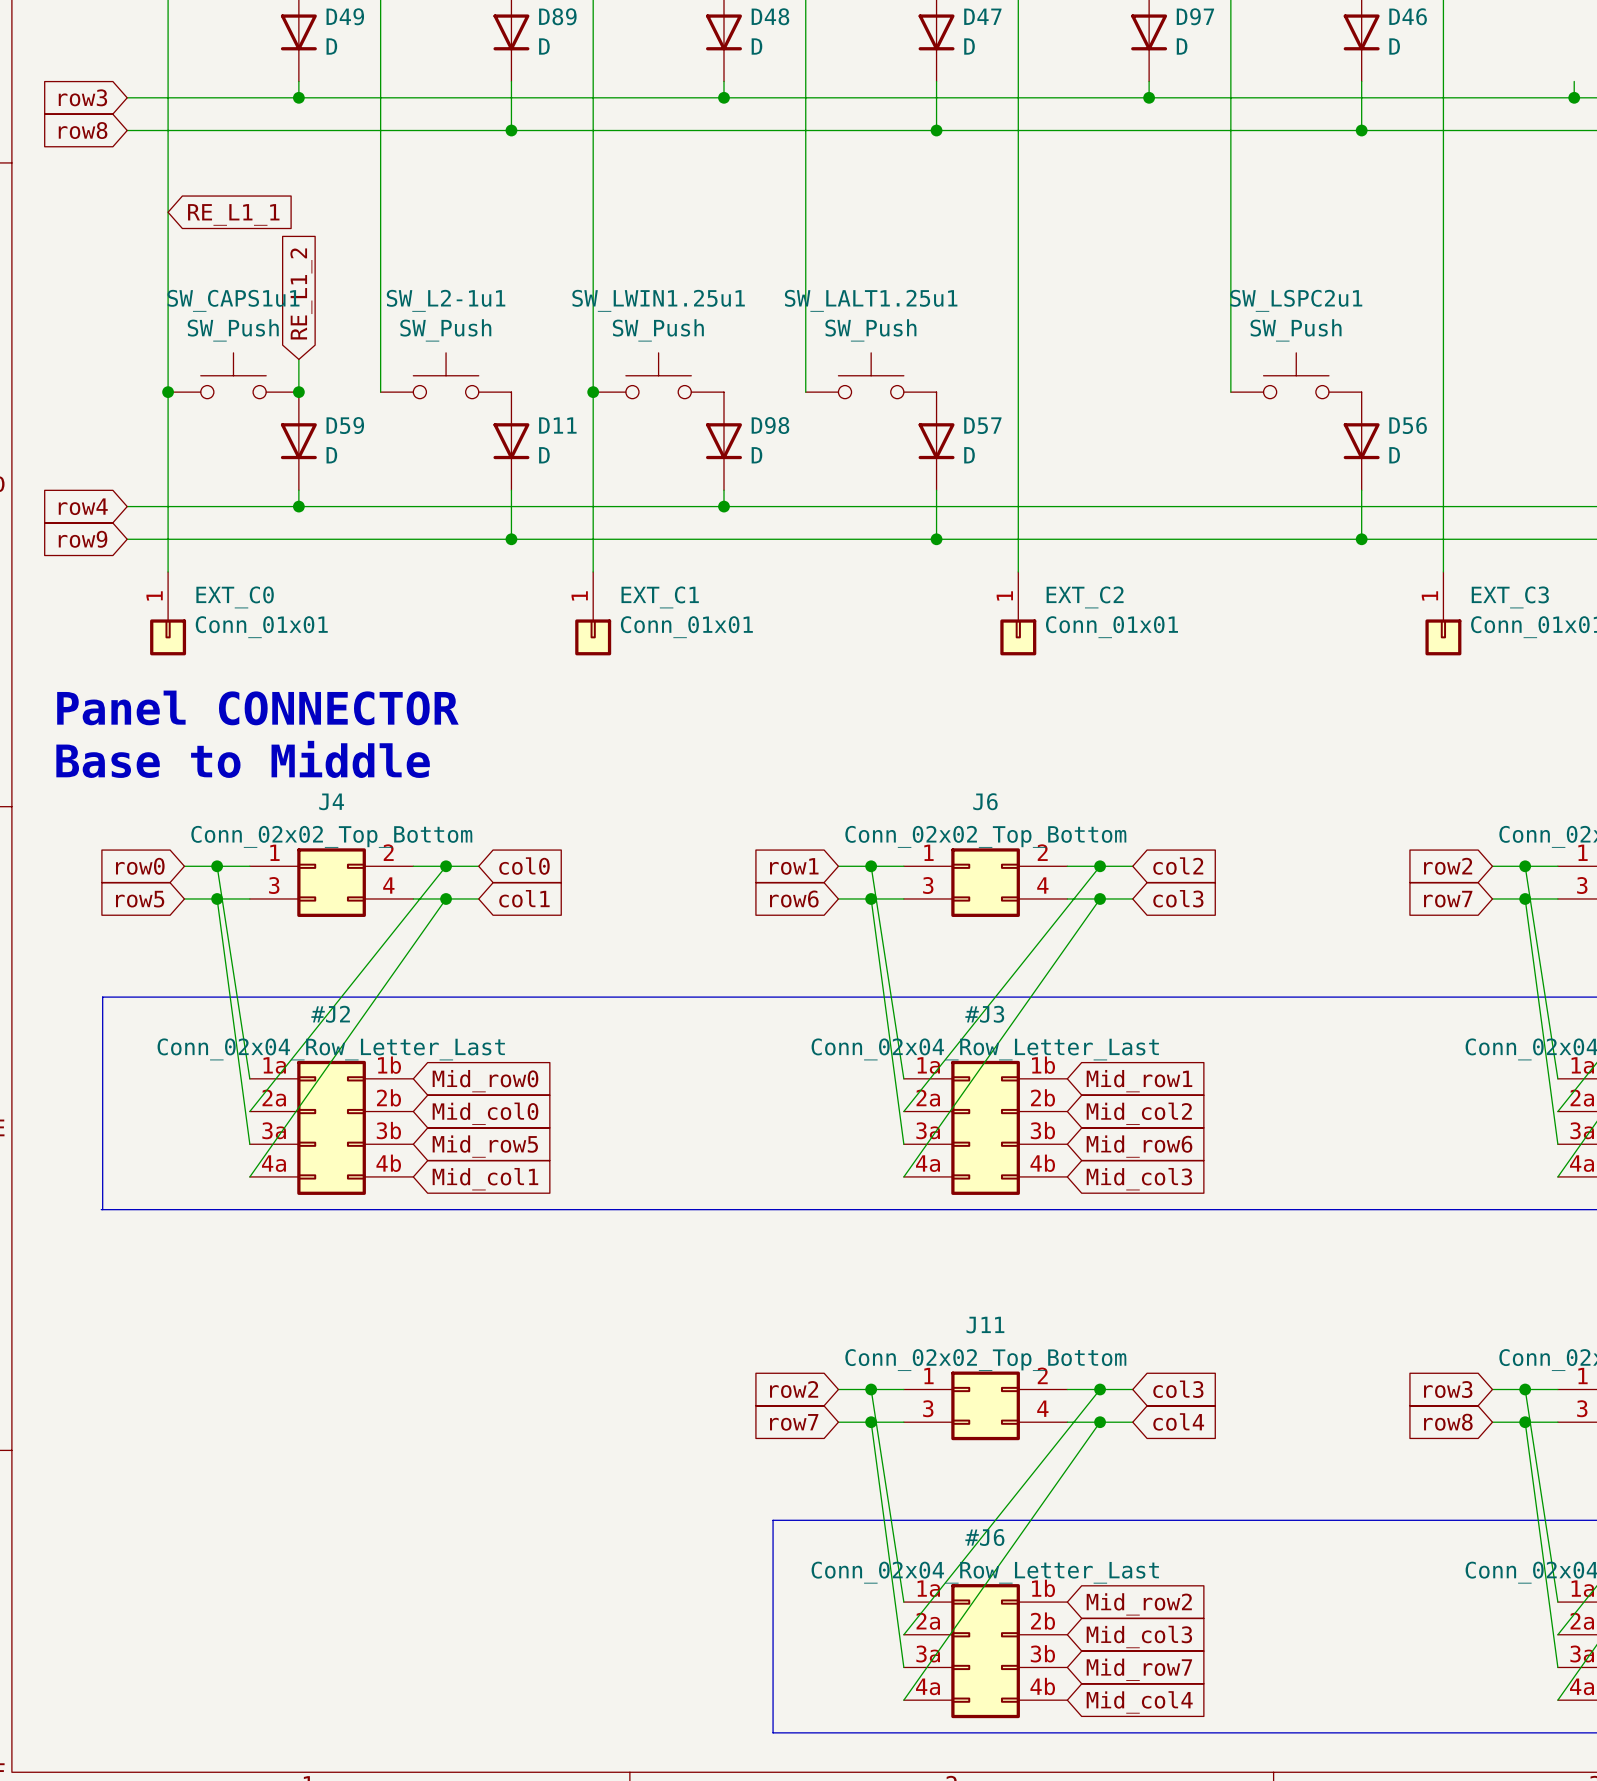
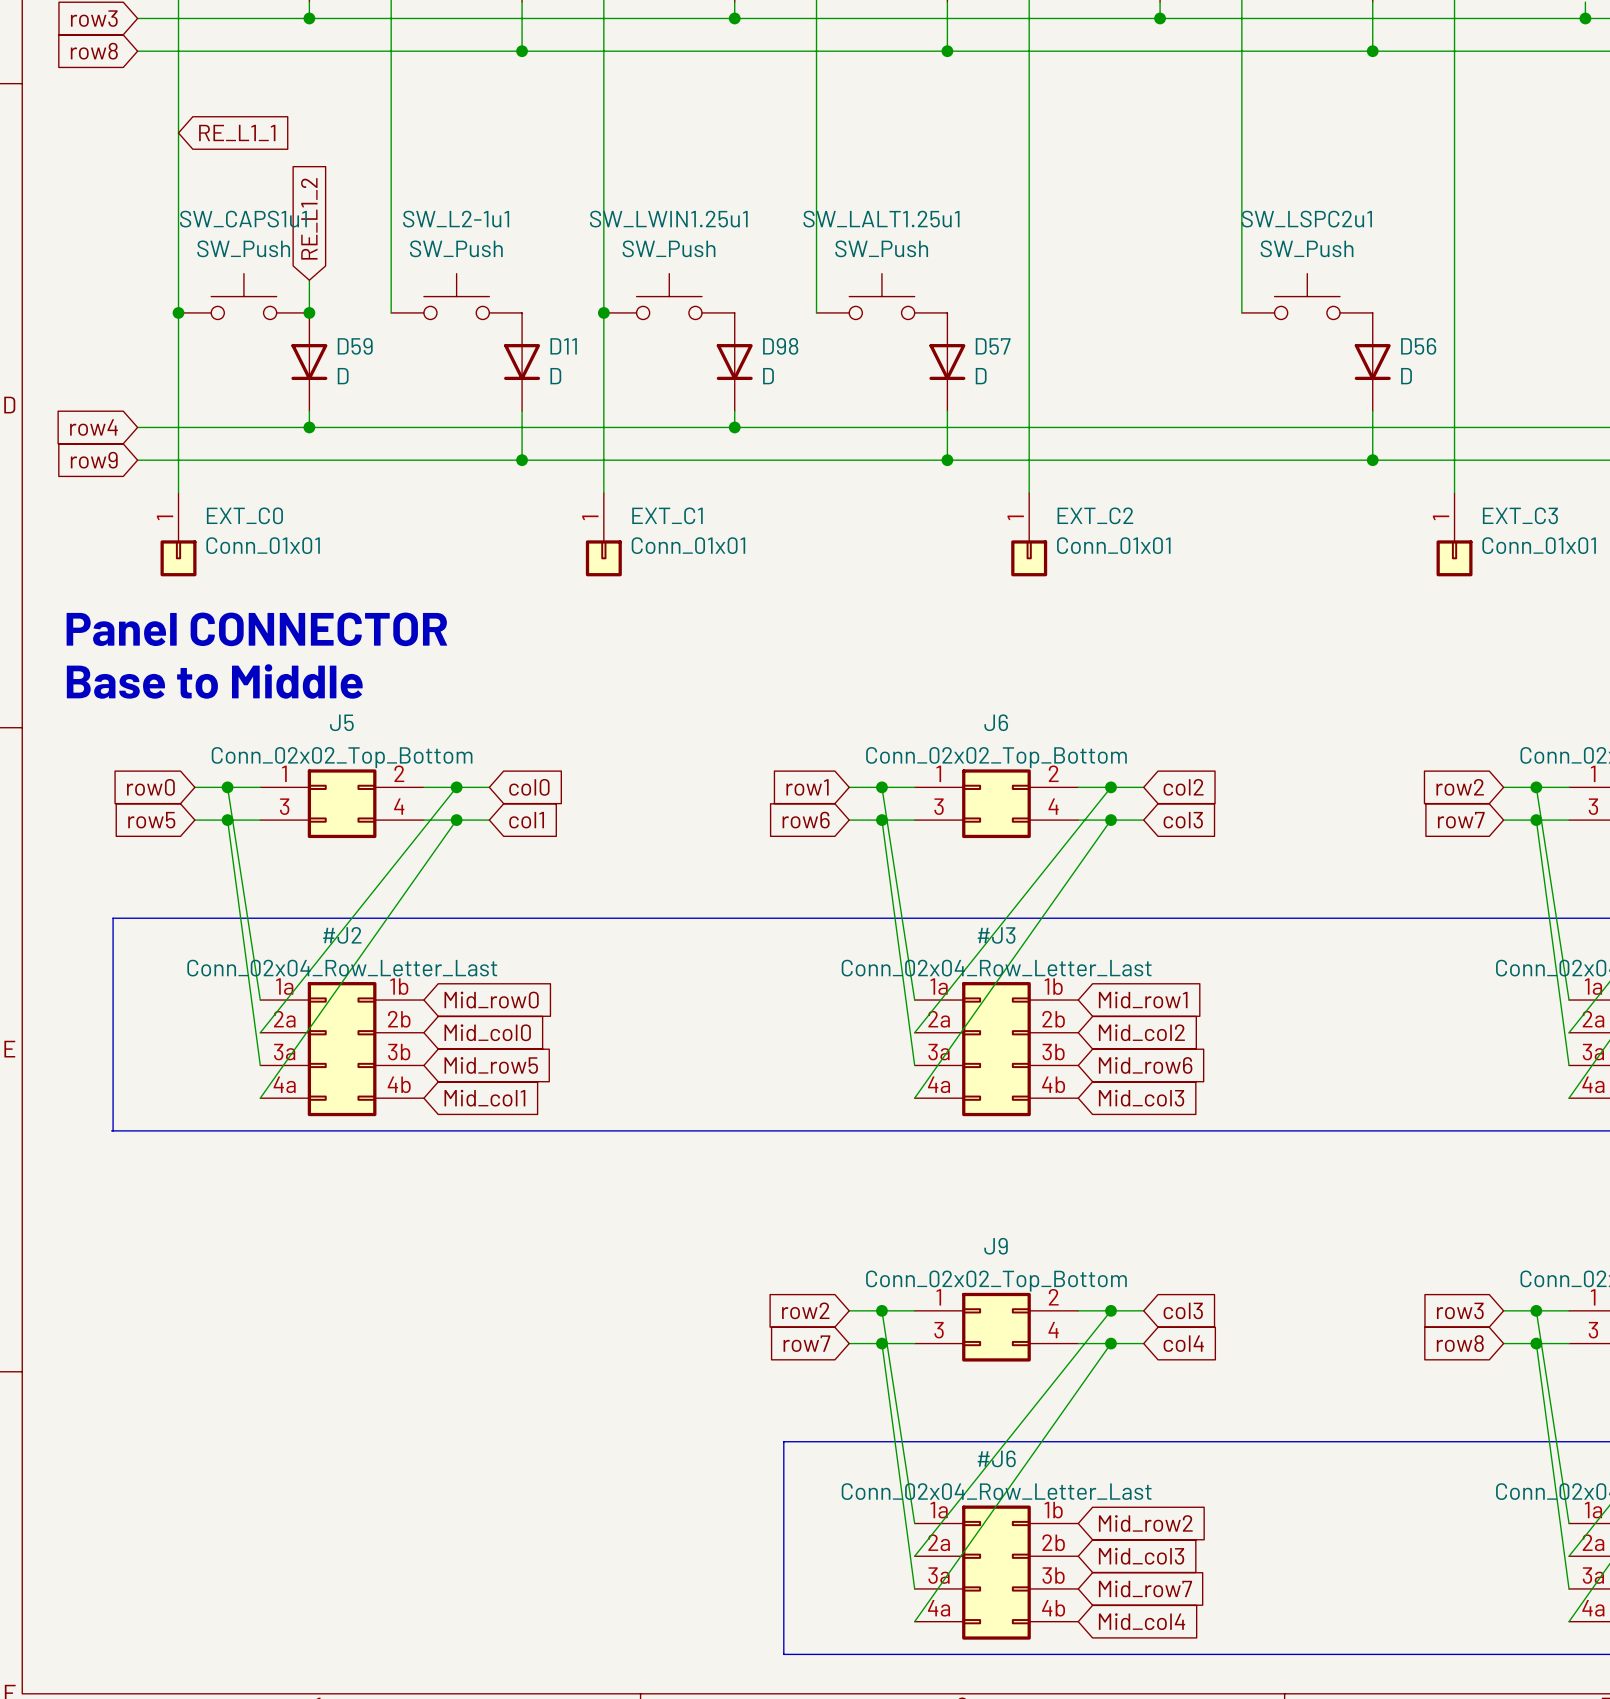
J4 name: J4 (331, 801) -> J5 (341, 722)
J11 name: J11 (985, 1325) -> J9 (996, 1246)

